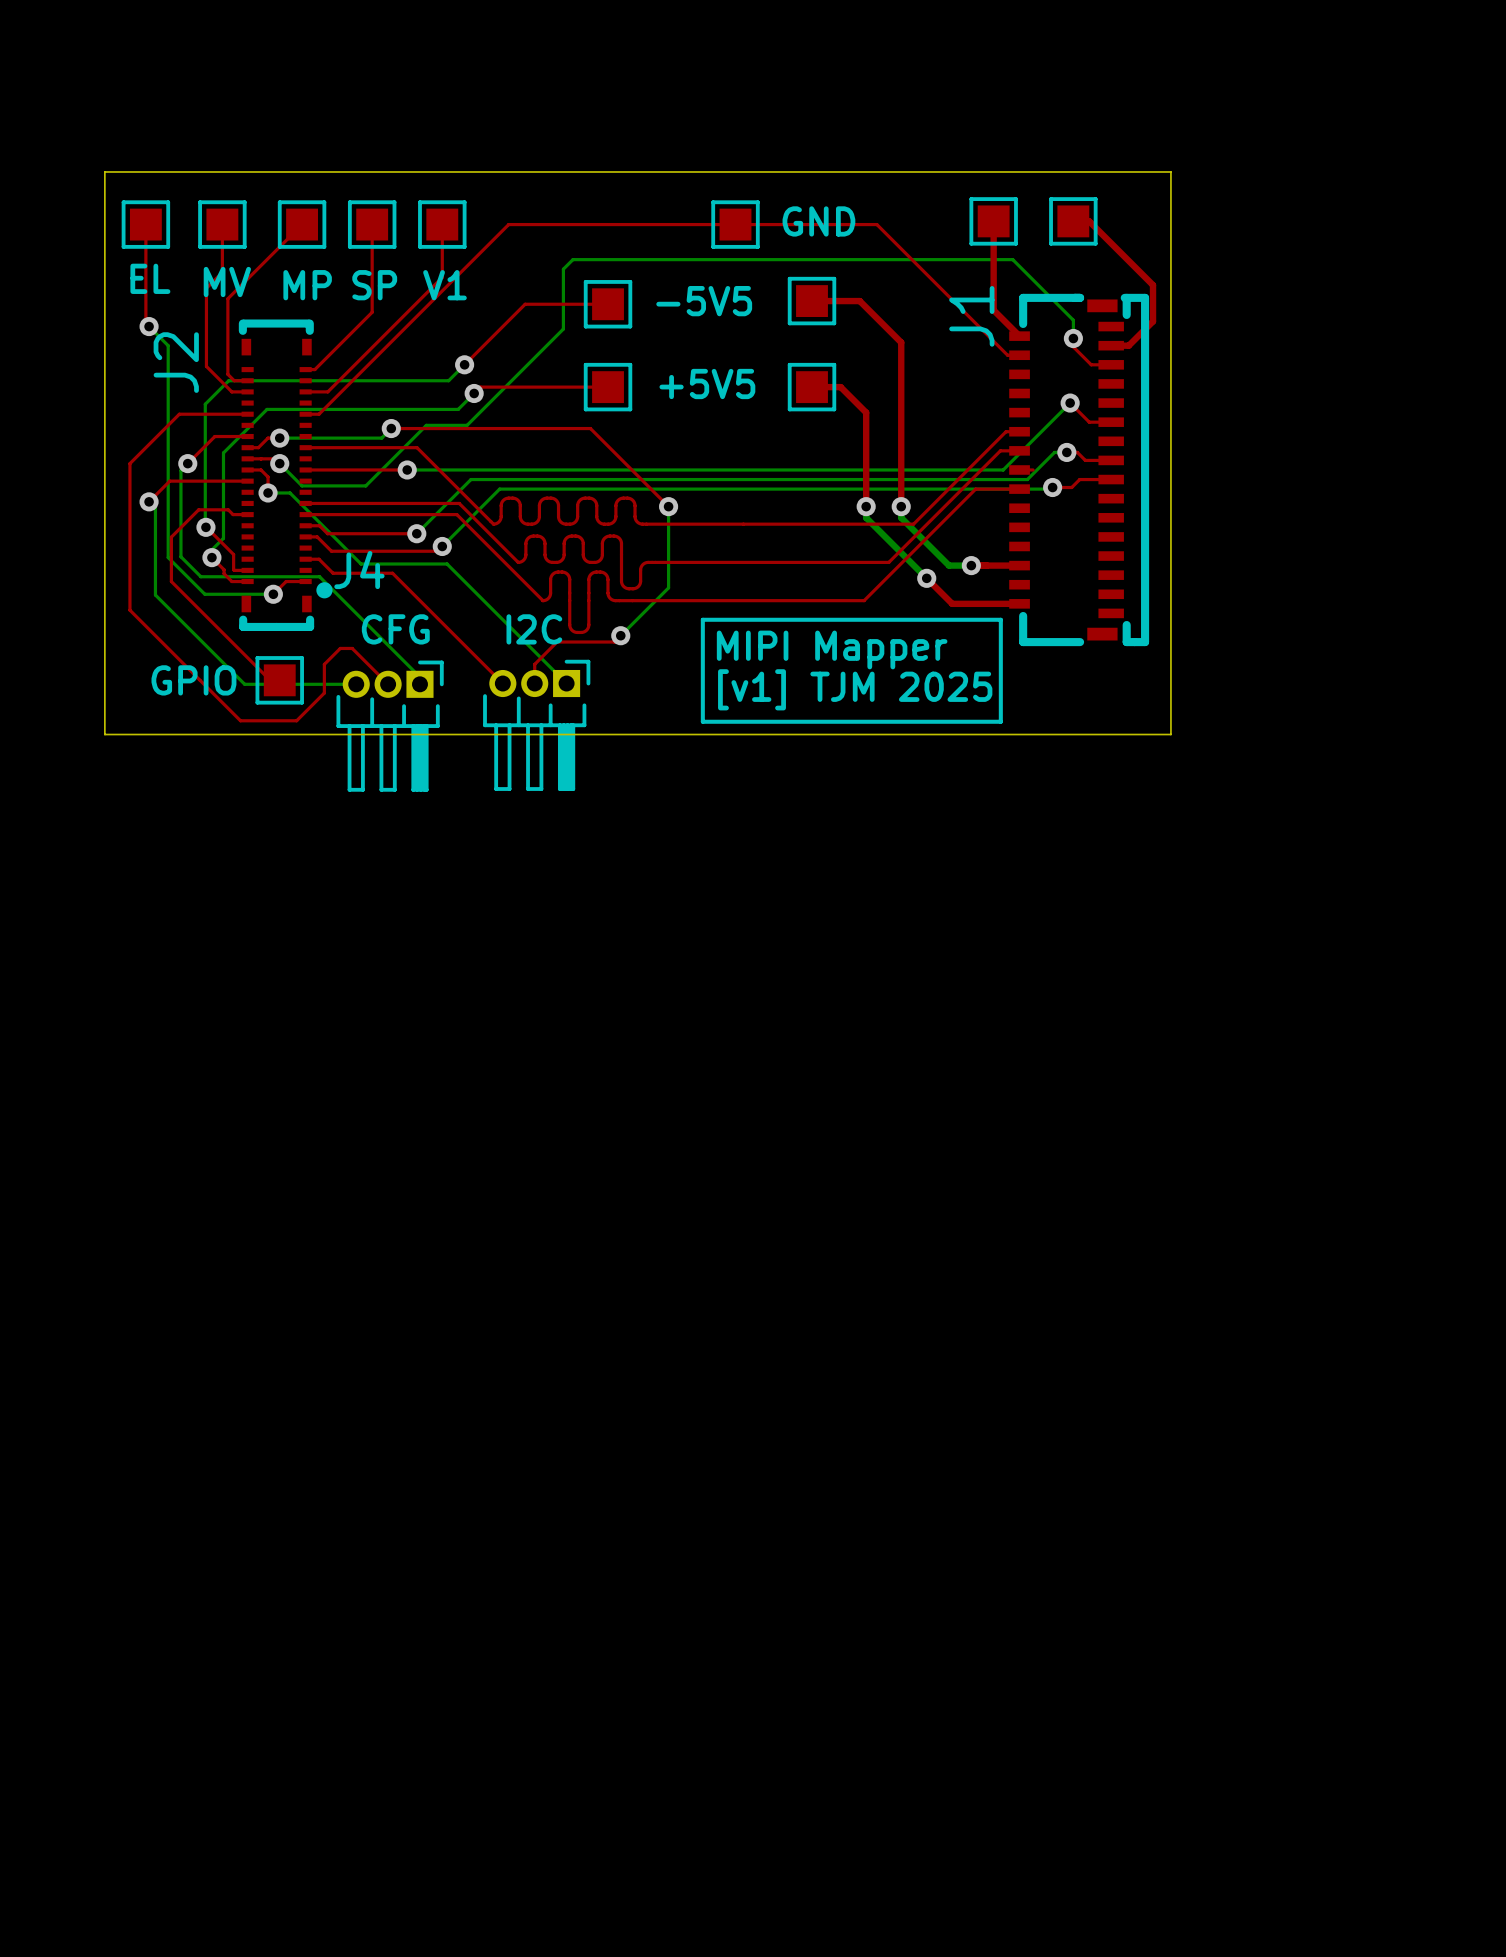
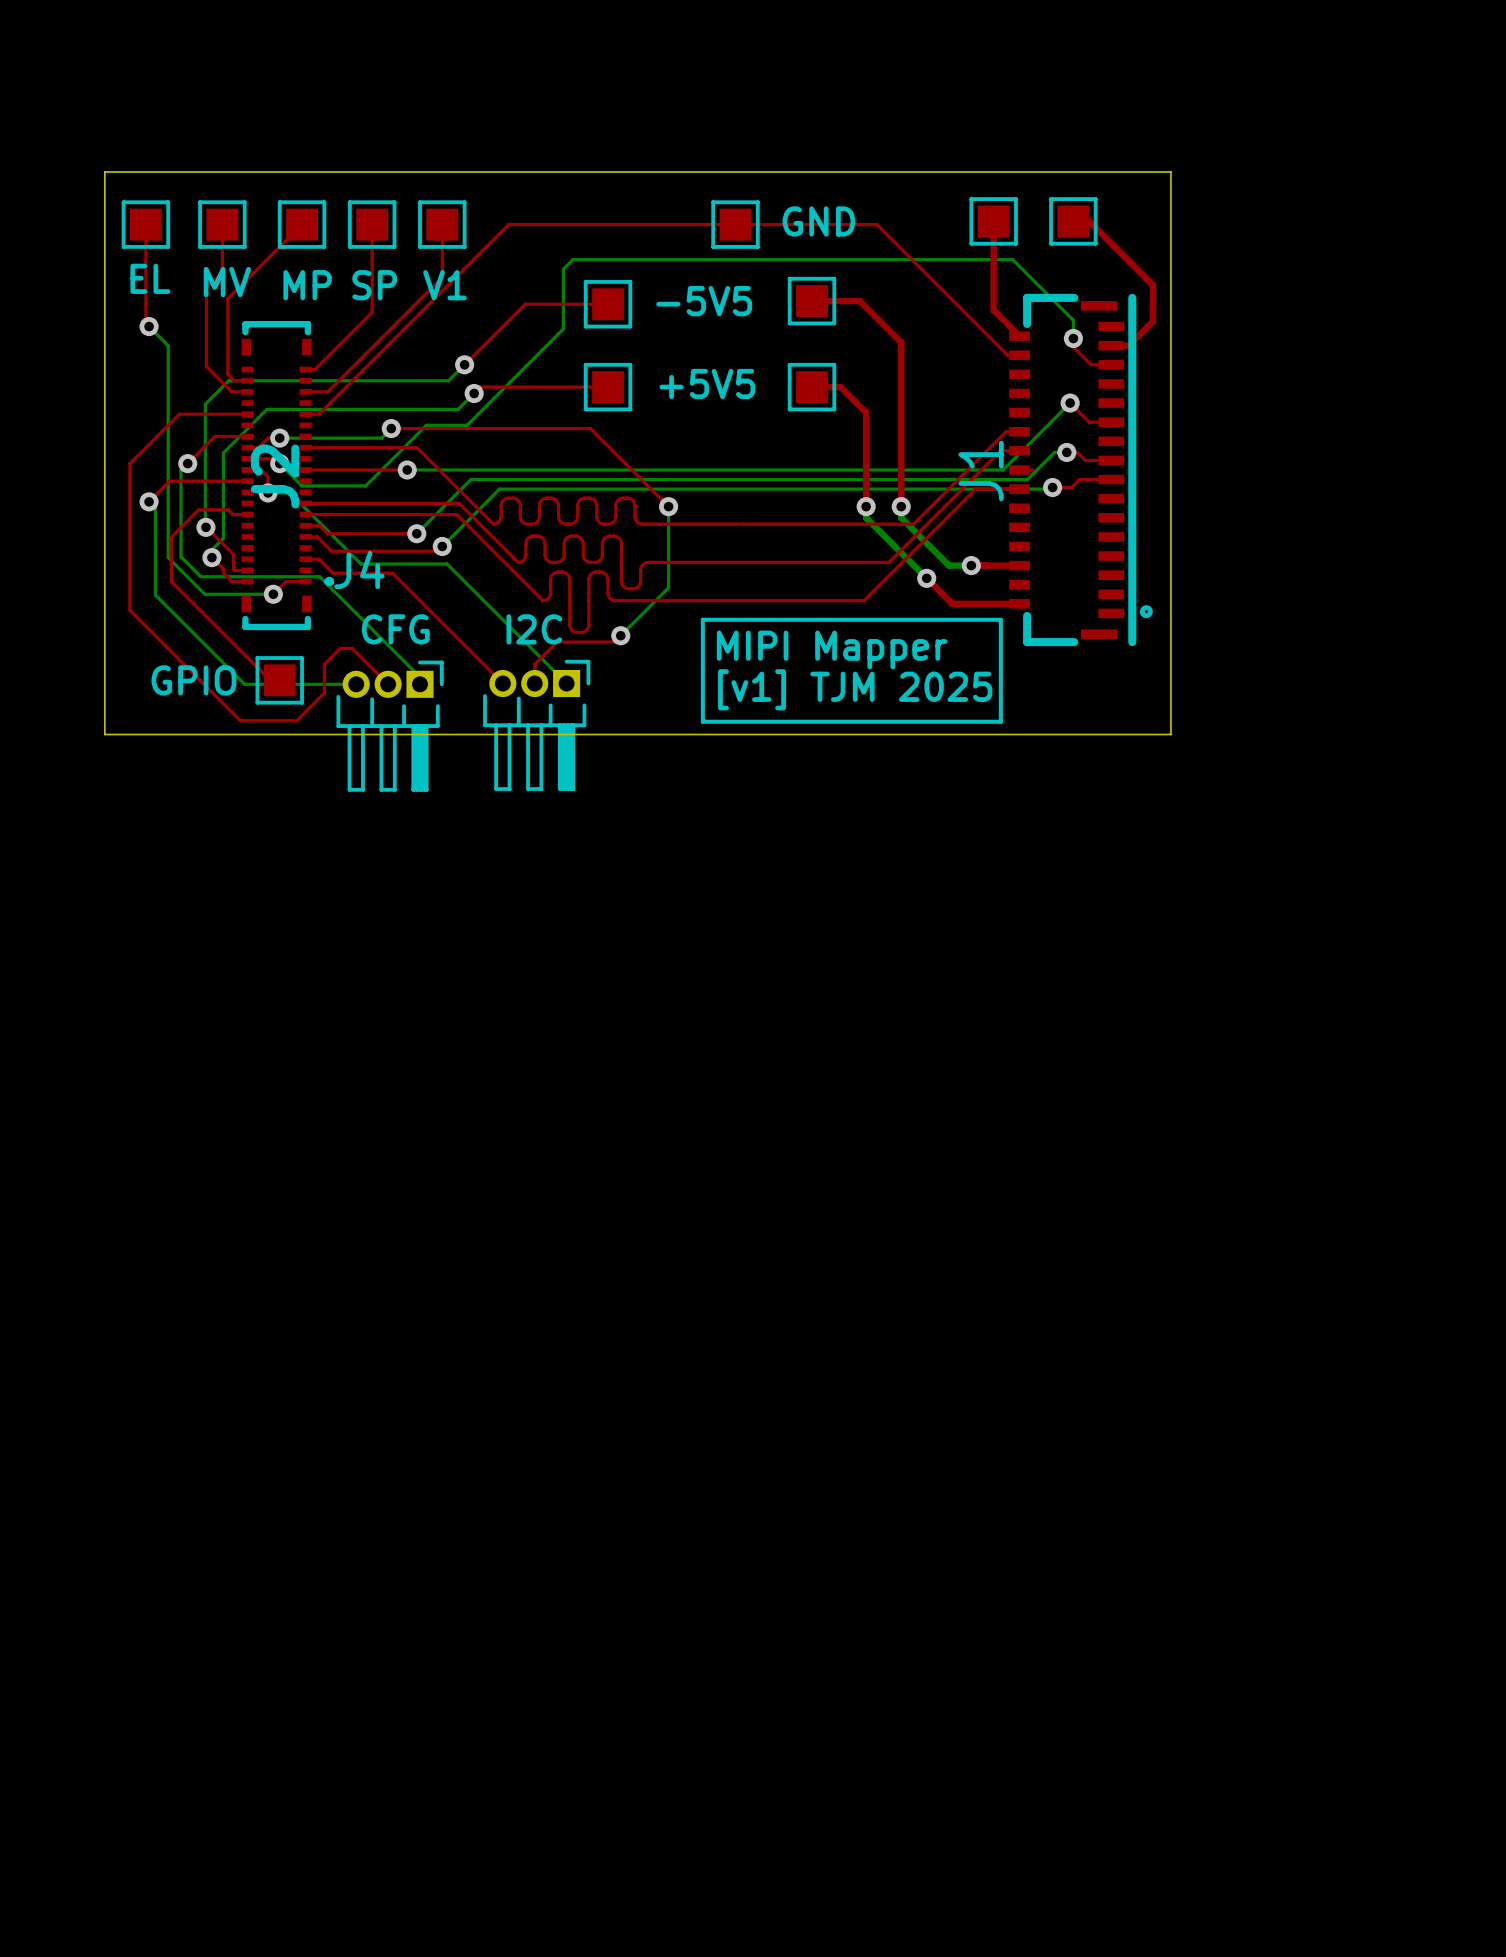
J1 footprint: [1009, 293, 1150, 647] -> [1009, 293, 1153, 647]
J1 name position: J1 (971, 316) -> J1 (981, 470)
J2 footprint: [238, 319, 333, 632] -> [241, 320, 335, 631]
J2 name position: J2 (176, 362) -> J2 (275, 476)

